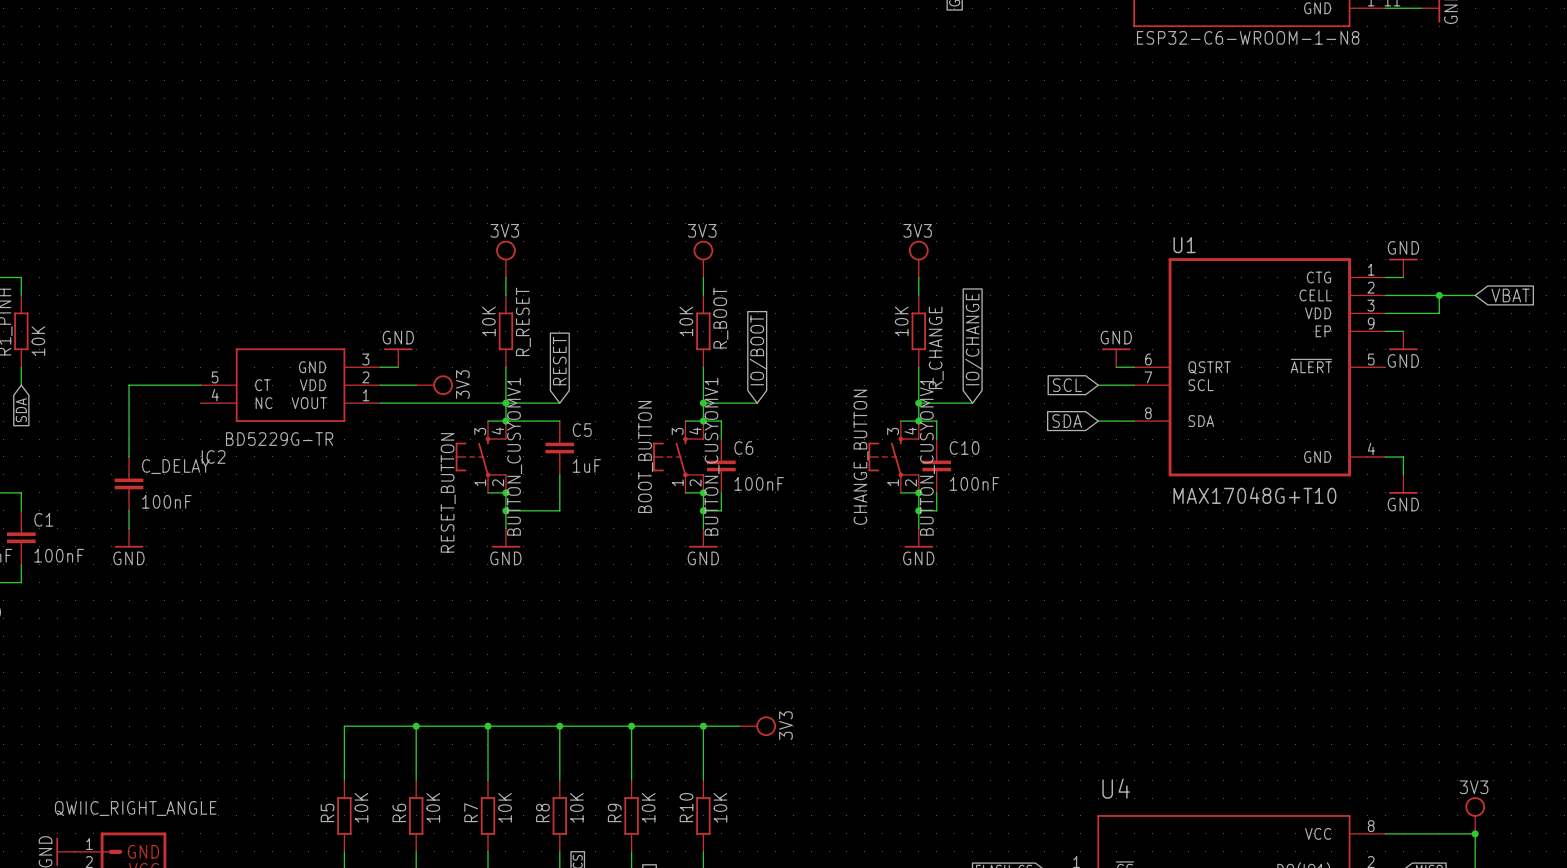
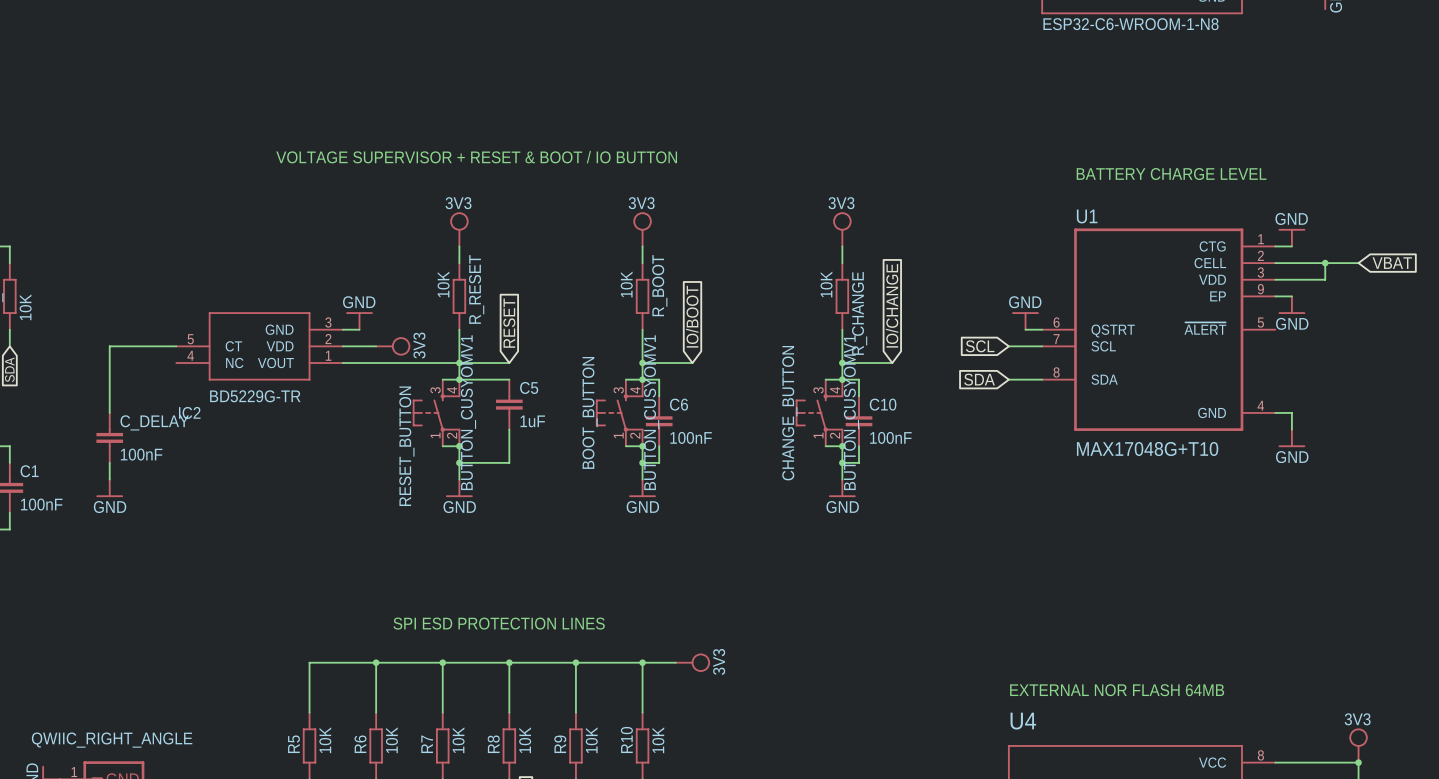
text: none -> VOLTAGE SUPERVISOR + RESET & BOOT / IO BUTTON (476, 157)
text: none -> BATTERY CHARGE LEVEL (1171, 174)
text: none -> SPI ESD PROTECTION LINES (499, 623)
text: none -> EXTERNAL NOR FLASH 64MB (1117, 690)

